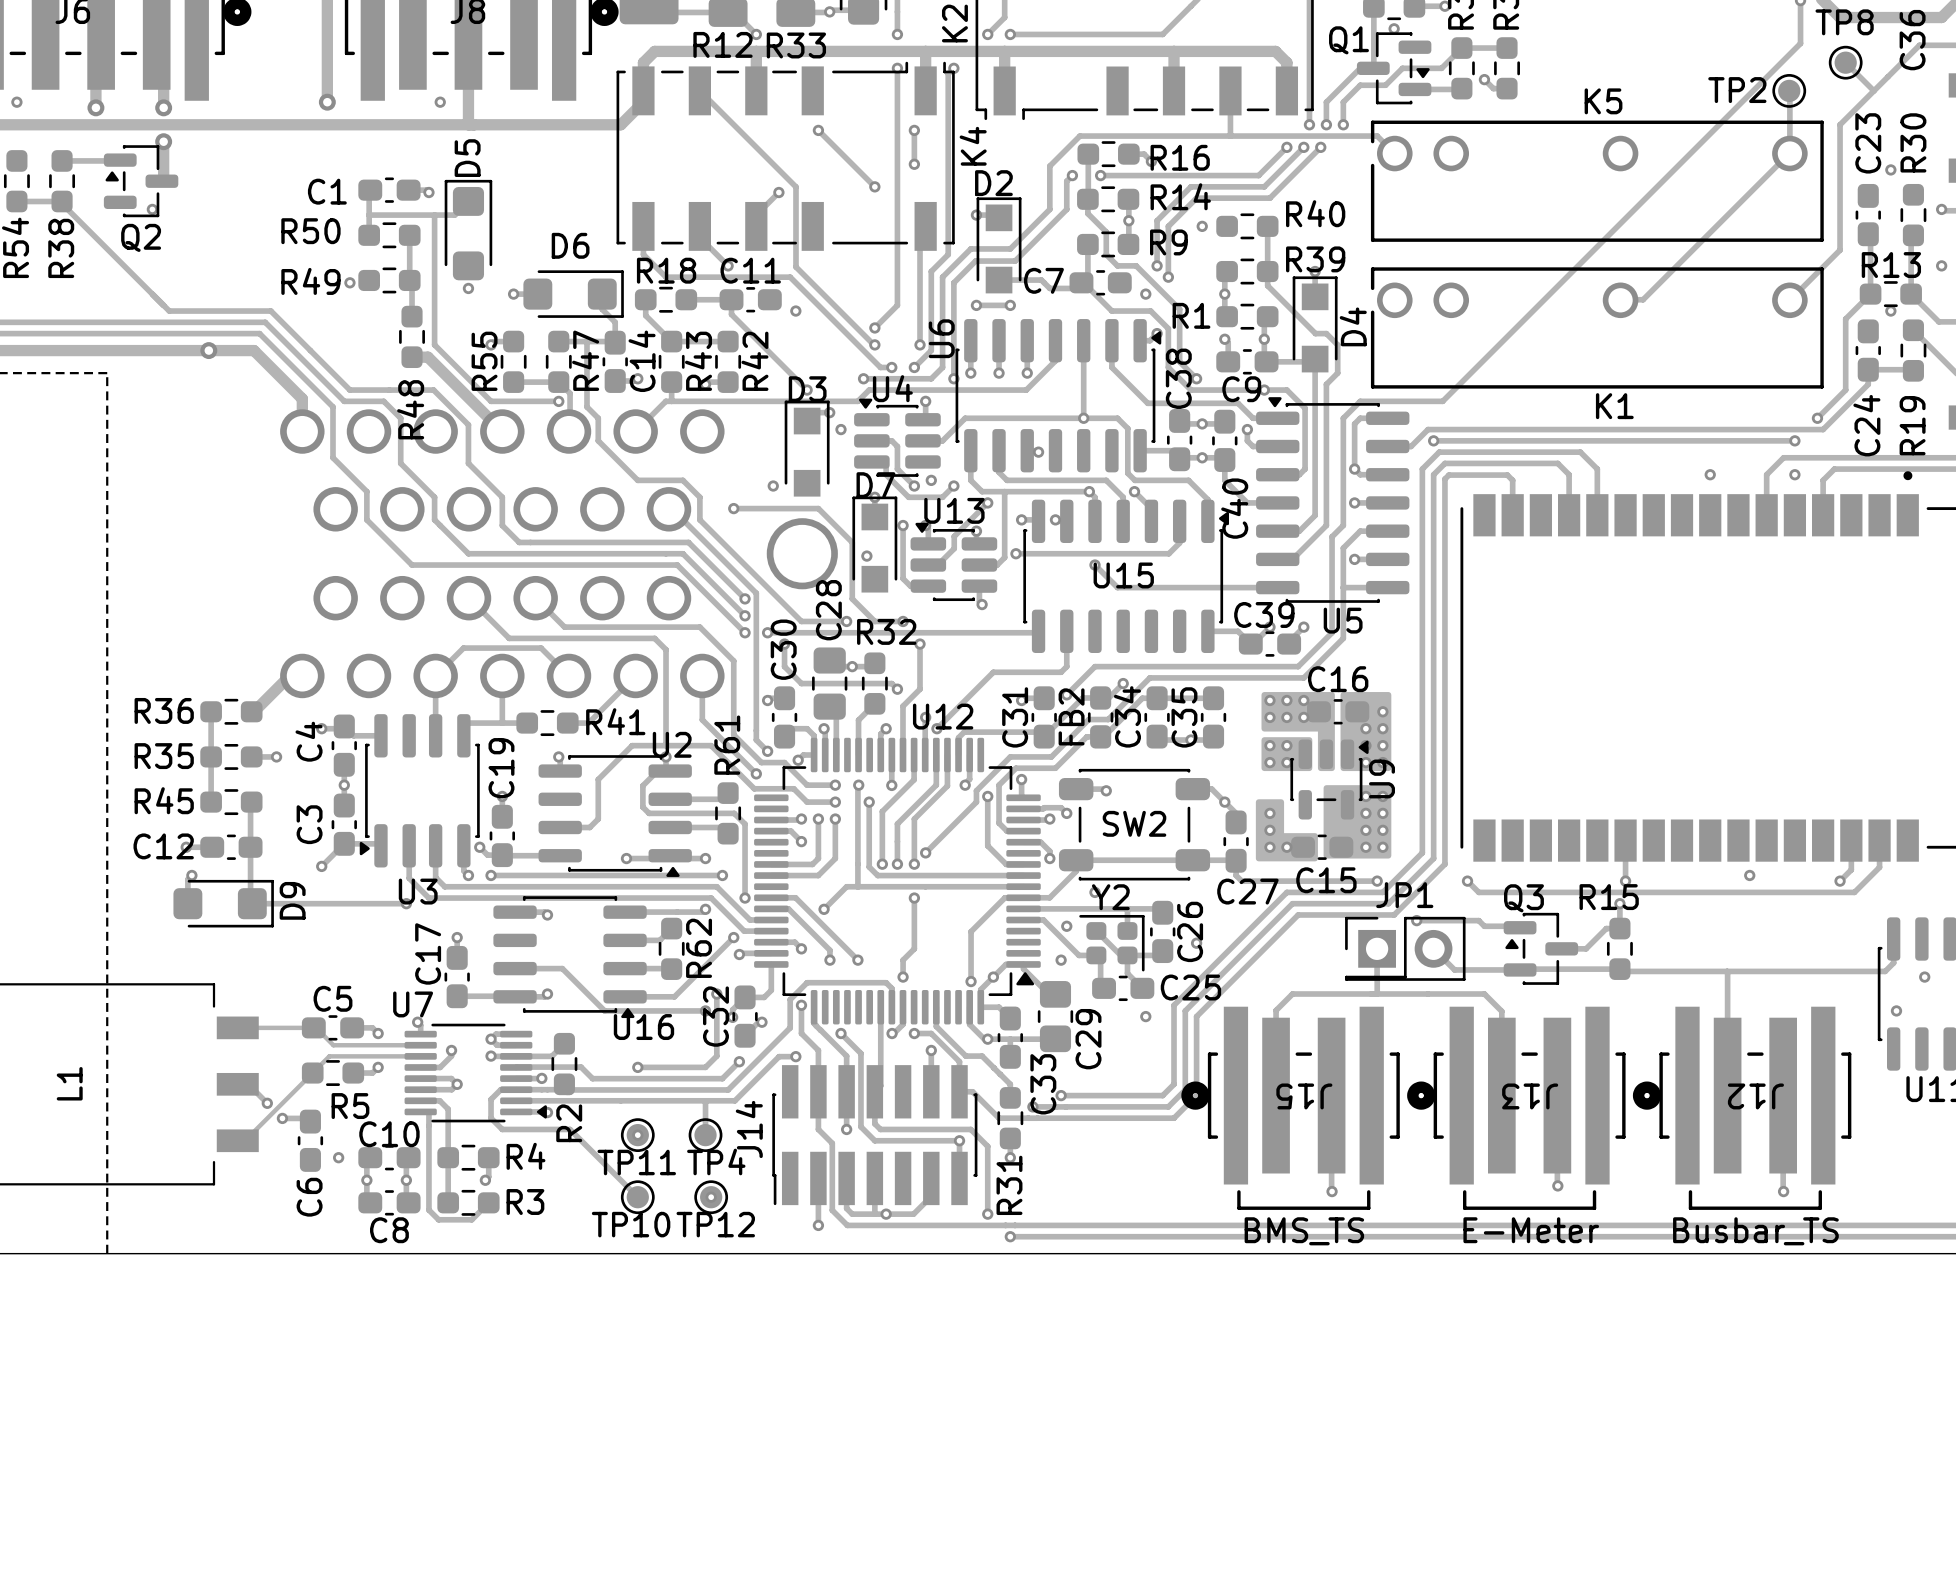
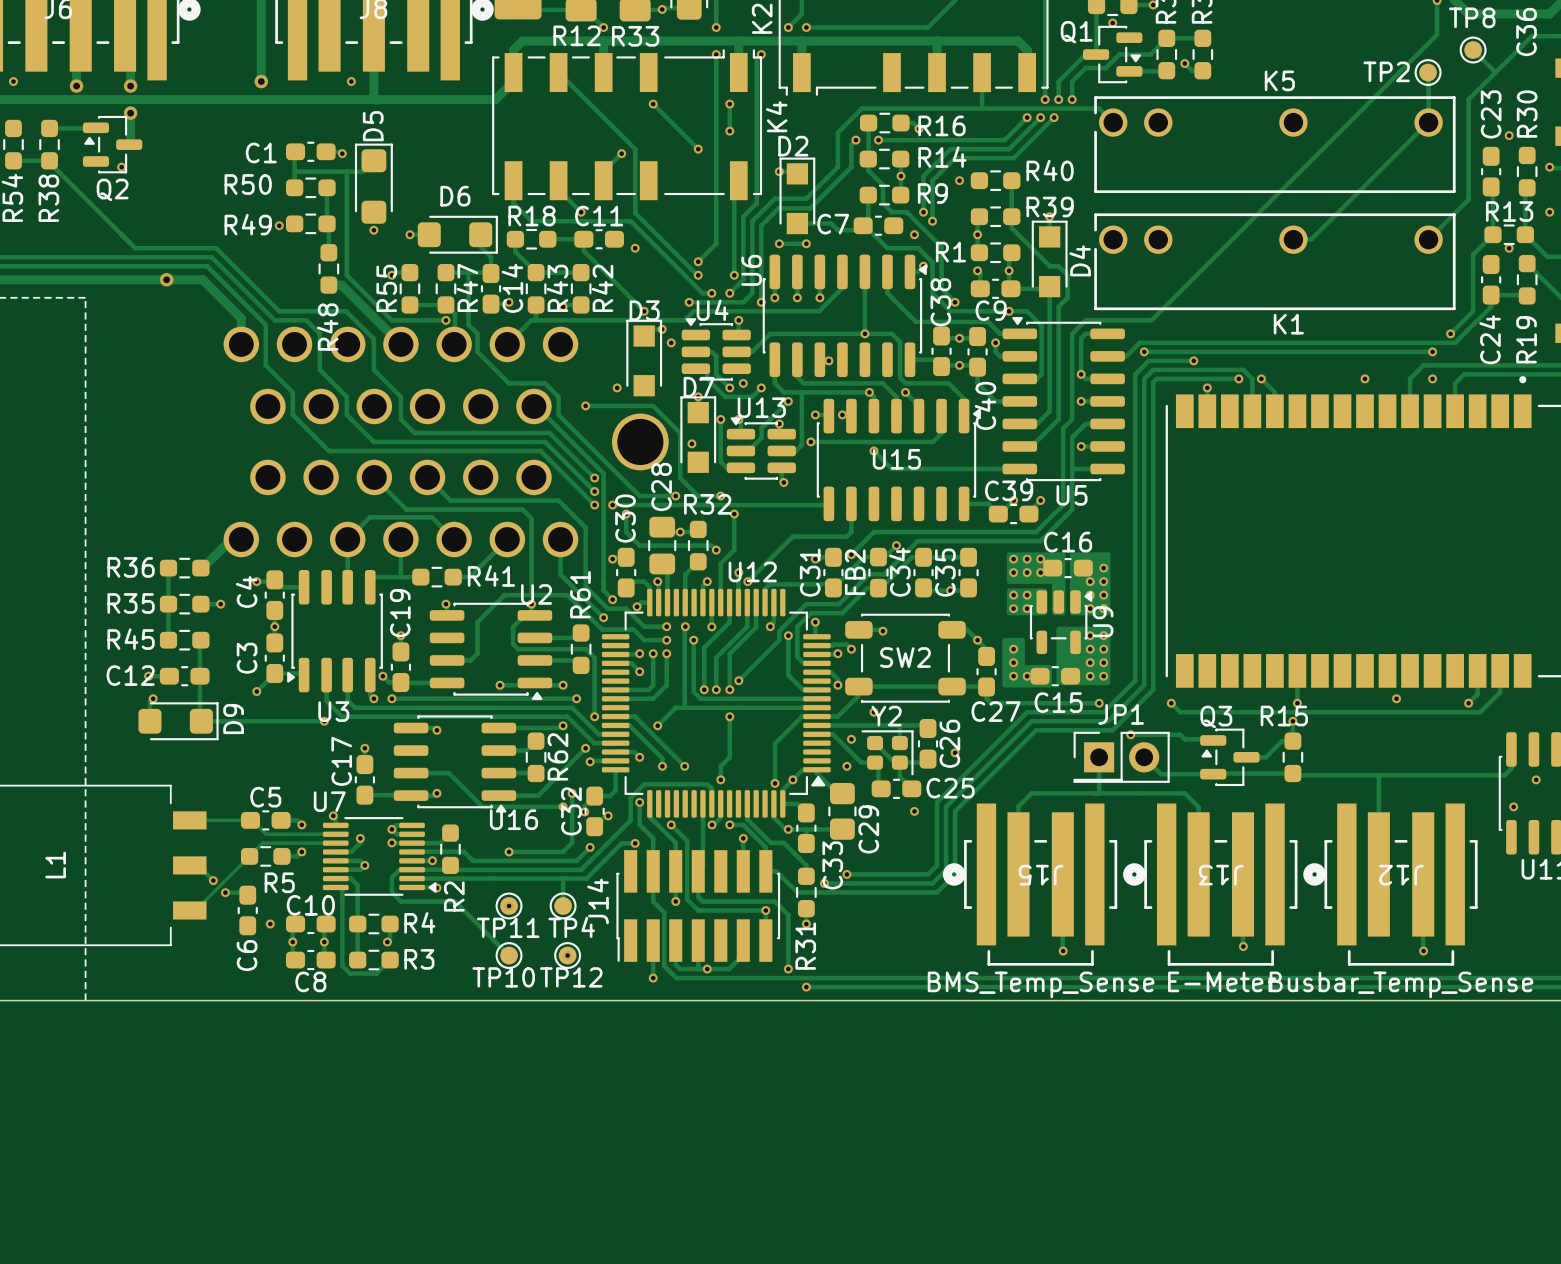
track: (1495, 452) (1580, 452) (1597, 469) (1597, 491) -> (1261, 378) (1274, 392)
via: none -> (1193, 360)
via: none -> (1238, 378)
via: none -> (1261, 378)
track: (1448, 475) (1507, 475) (1512, 480) (1512, 486) -> (1156, 379) (1238, 378)
via: none -> (1207, 387)
J15 value: BMS_TS (1304, 1231) -> BMS_Temp_Sense (1041, 984)
J12 value: Busbar_TS (1755, 1231) -> Busbar_Temp_Sense (1401, 984)

